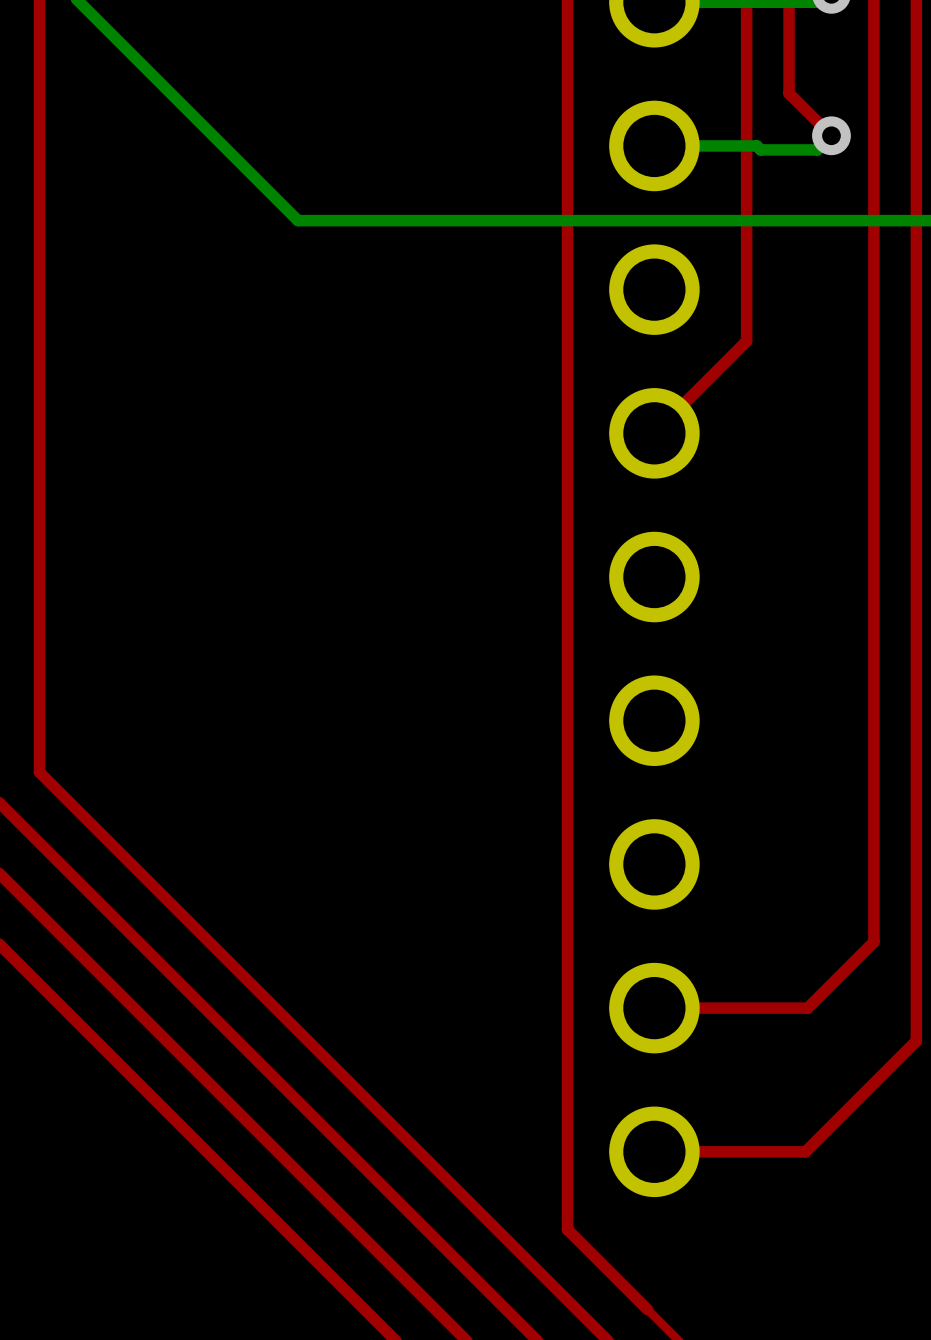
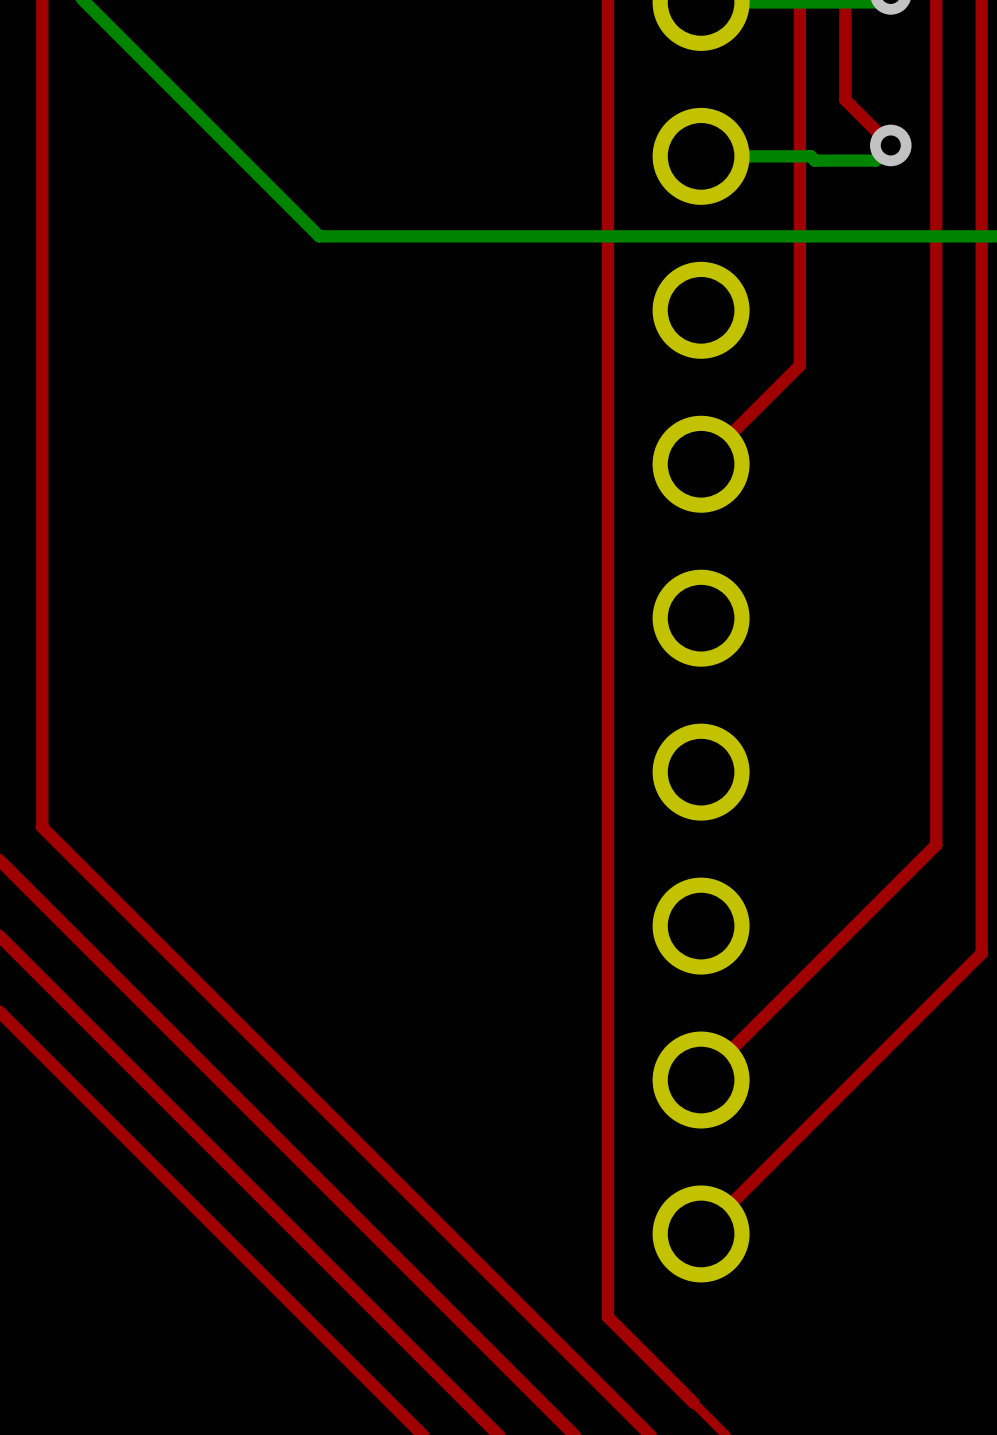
top track: (873, 788) (873, 941) (807, 1008) (654, 1008) -> (936, 844) (701, 1080)
top track: (916, 889) (916, 1040) (805, 1151) (654, 1151) -> (981, 953) (701, 1233)

